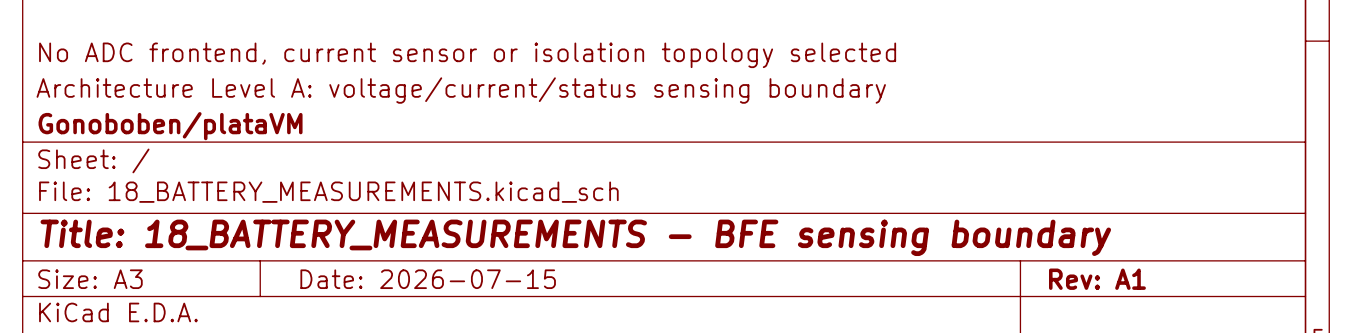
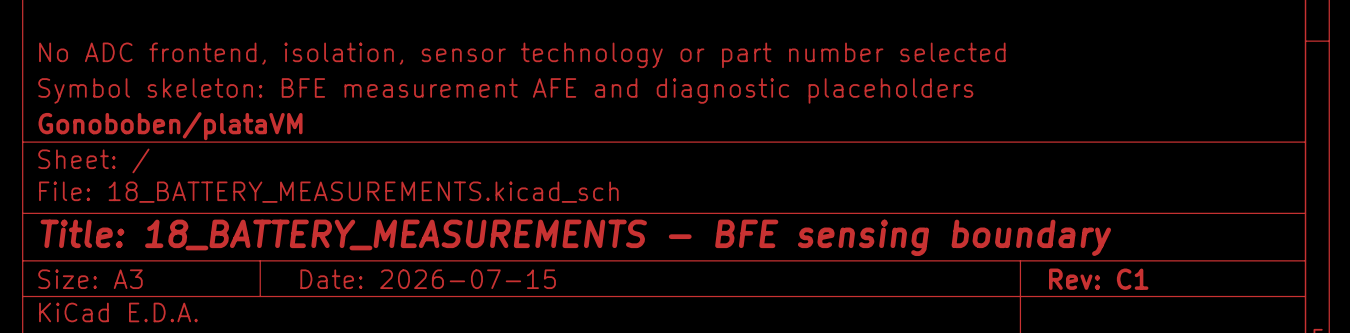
title block: No ADC frontend, current sensor or isolation topology selected (467, 55) -> No ADC frontend, isolation, sensor technology or part number selected (522, 55)
title block: Architecture Level A: voltage/current/status sensing boundary (461, 90) -> Symbol skeleton: BFE measurement AFE and diagnostic placeholders (505, 90)
title block: Rev: A1 (1097, 279) -> Rev: C1 (1098, 279)

